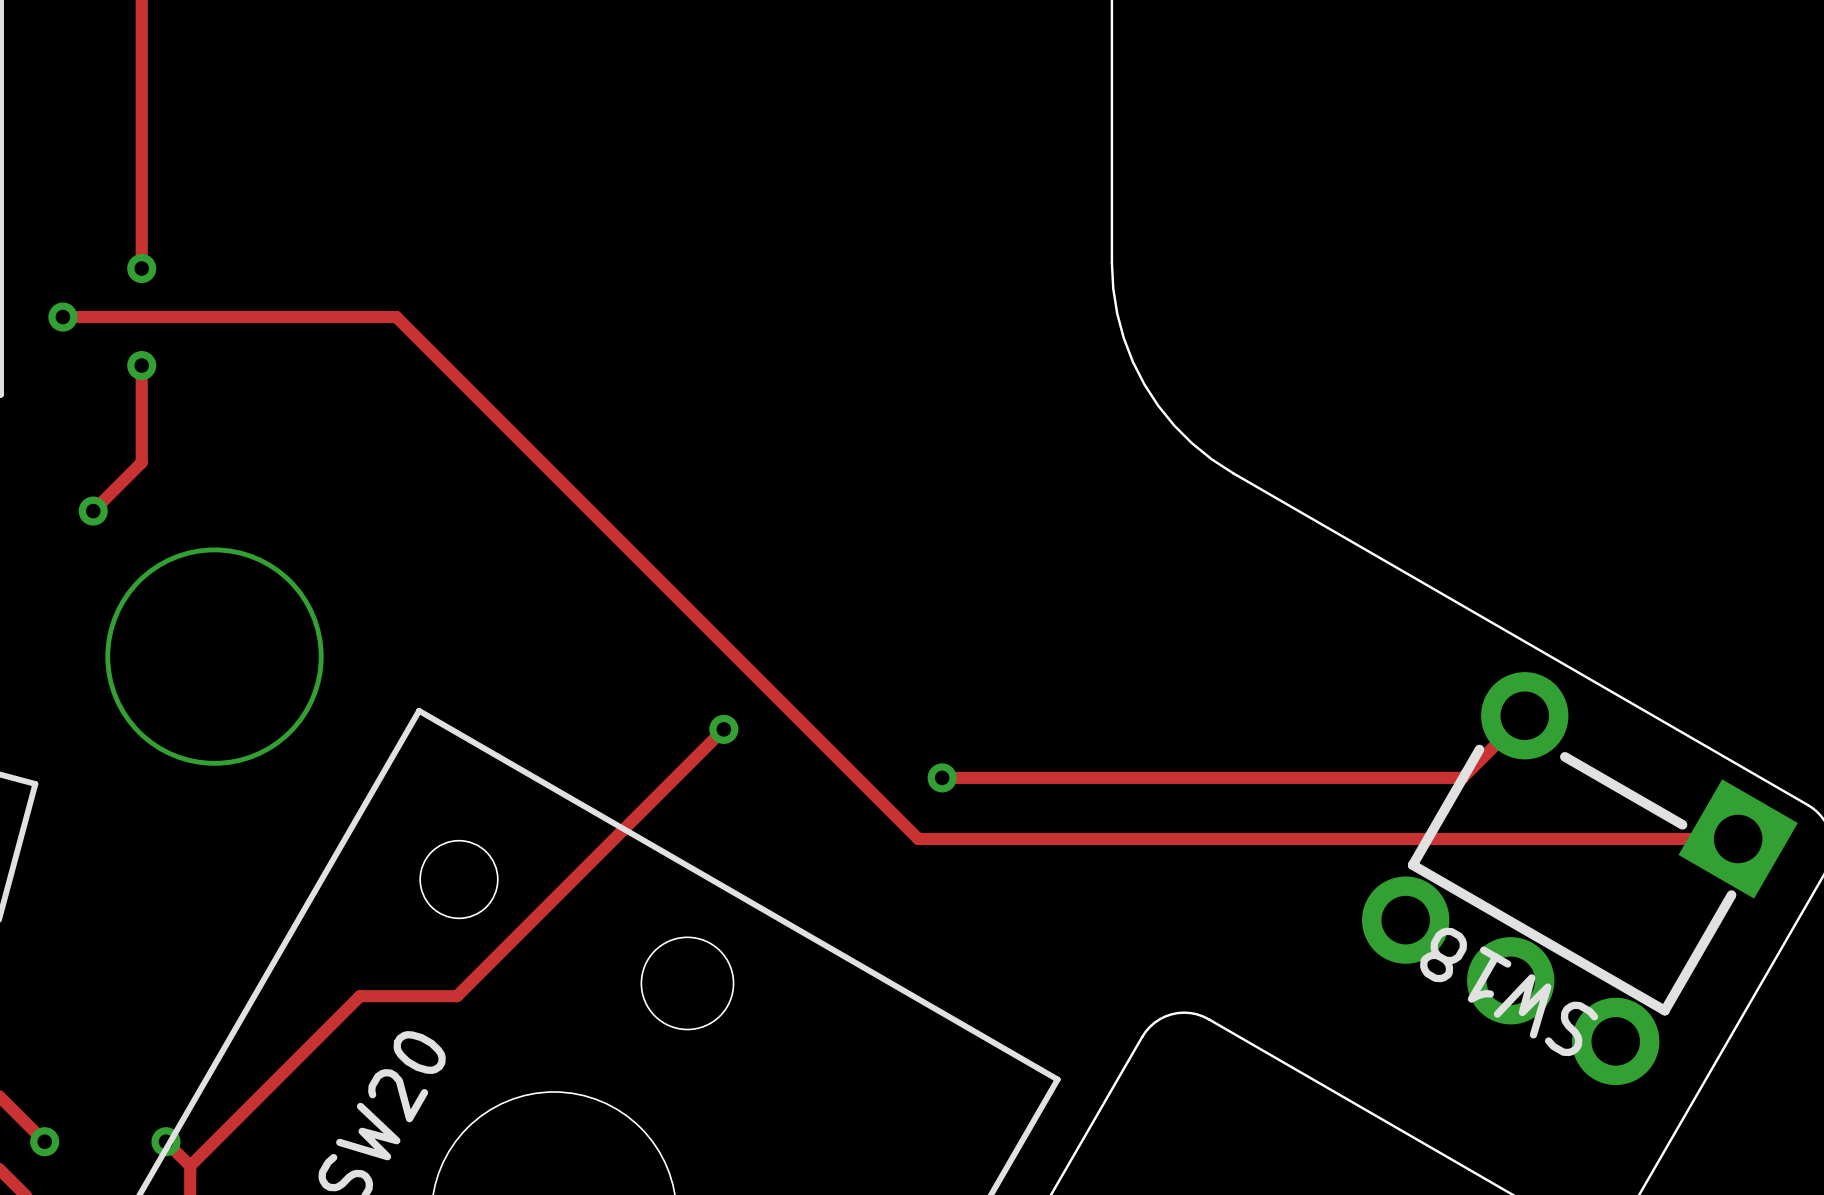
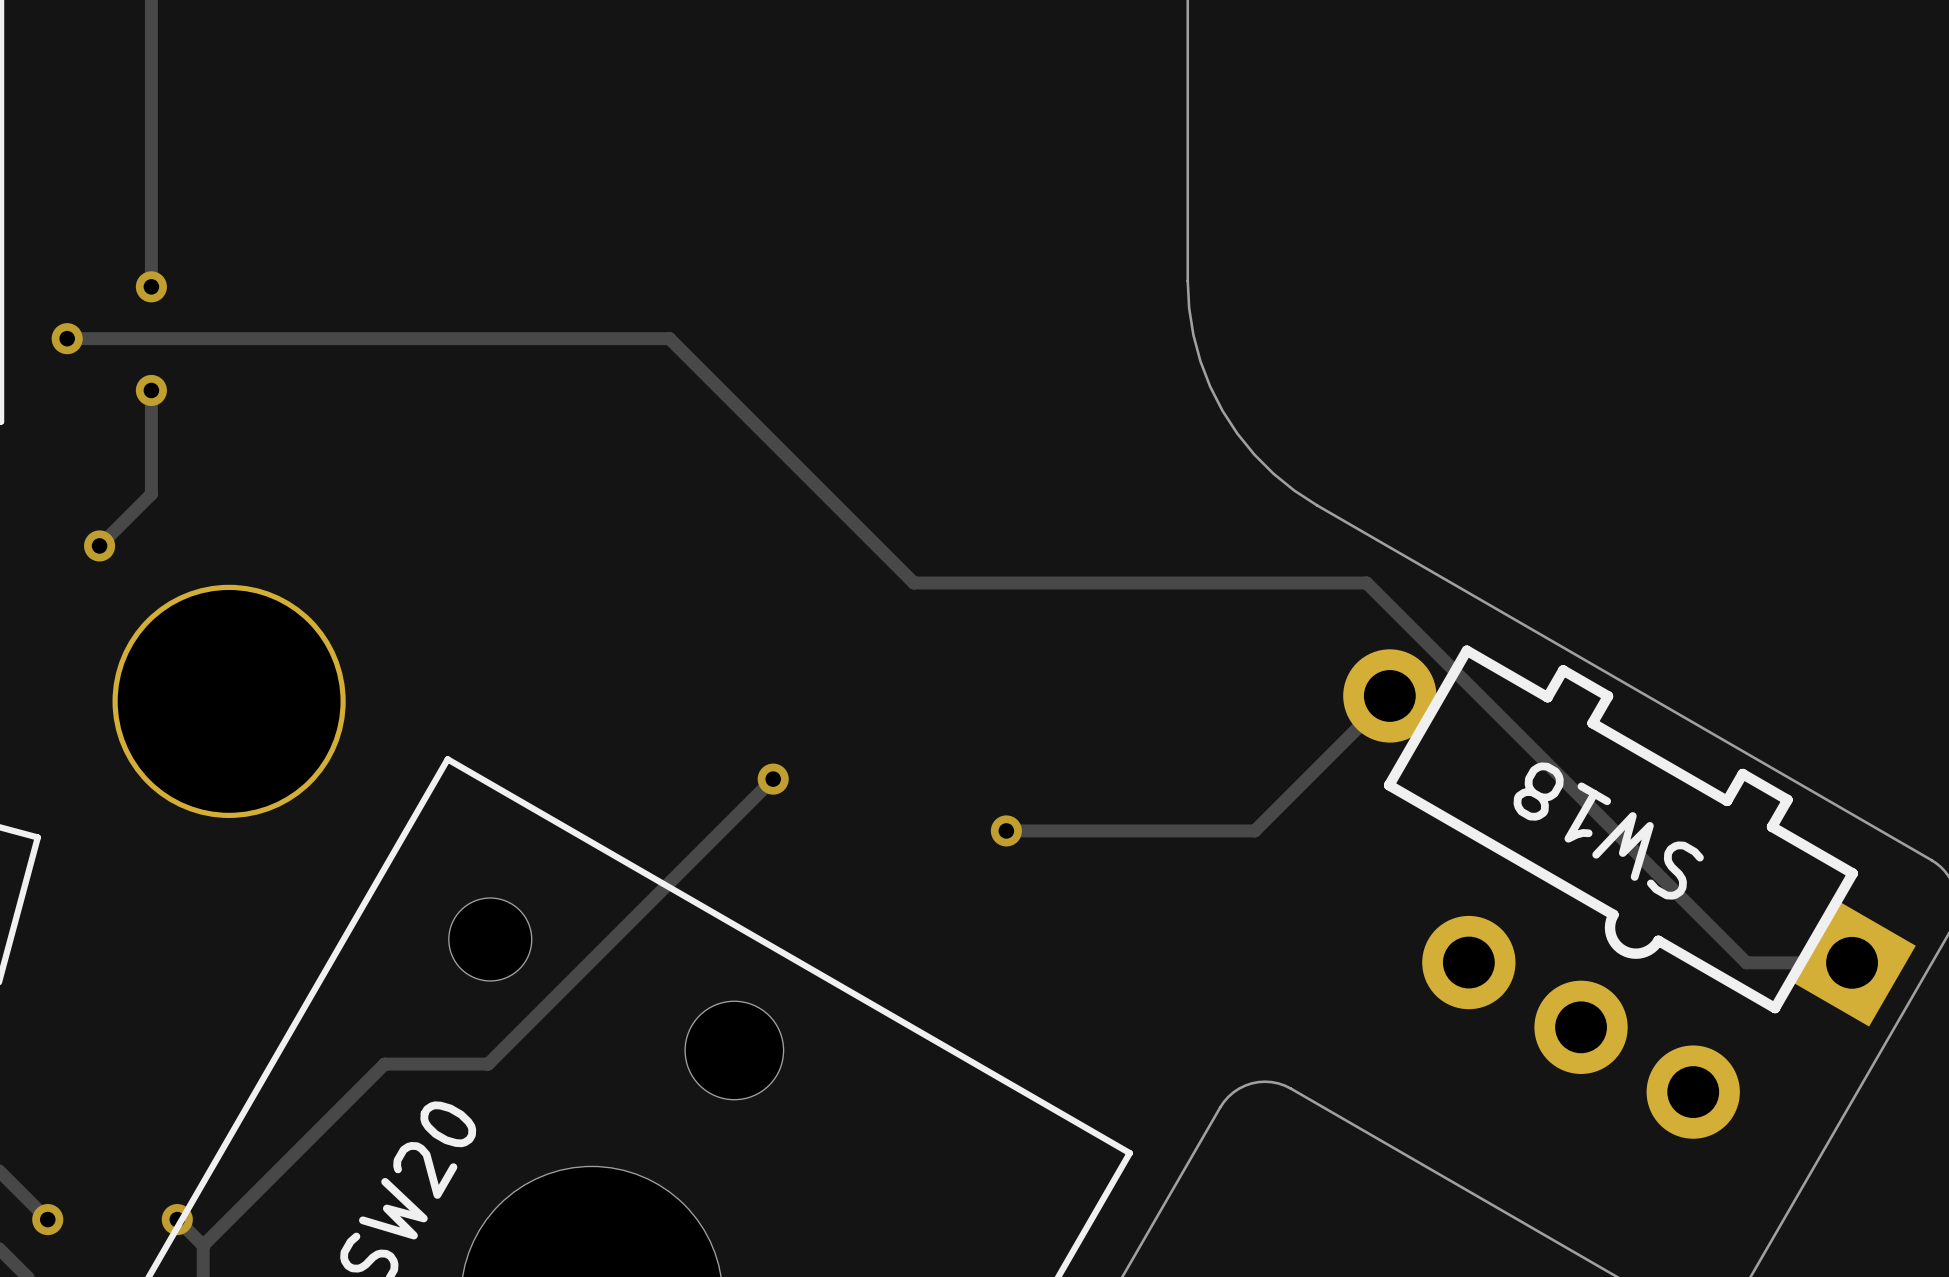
track: (396, 317) (918, 838) (1738, 838) -> (423, 338) (669, 338) (913, 582) (1366, 582) (1746, 962) (1852, 962)
SW18 footprint: [1407, 672, 1798, 1016] -> [1343, 645, 1916, 1027]
track: (1524, 715) (1462, 777) (1174, 777) -> (1389, 695) (1254, 830)
part position: (1510, 980) -> (1581, 1027)
SW18 name position: SW18 (1509, 991) -> SW18 (1608, 831)

